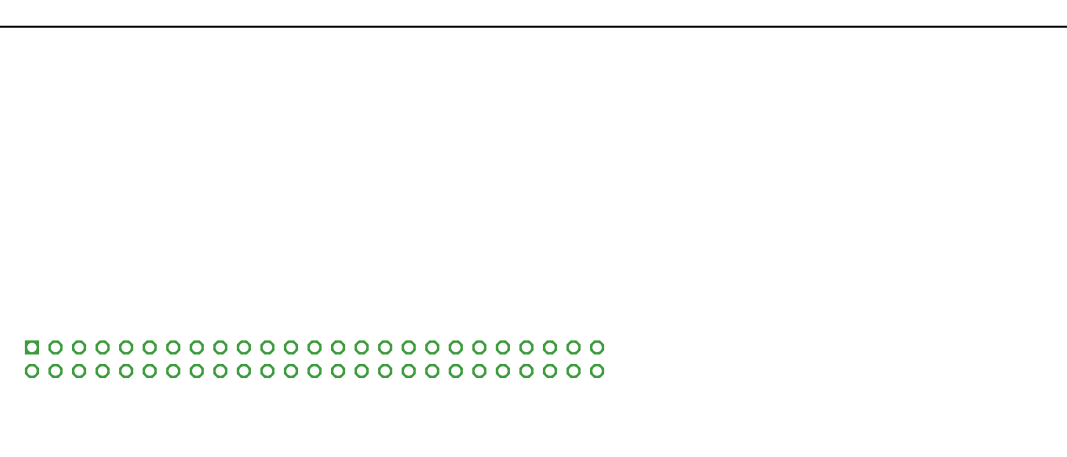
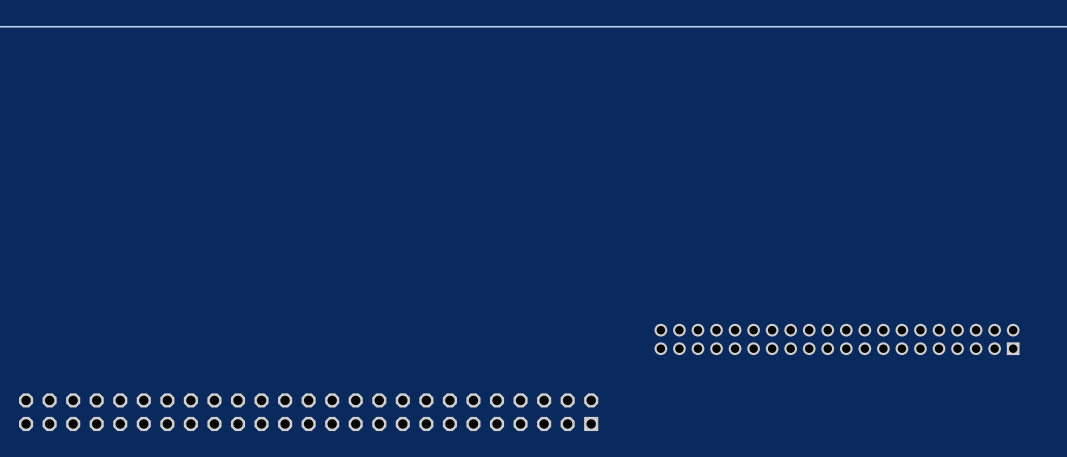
part: none -> (837, 339)
part rotation: 0° (314, 359) -> 180° (308, 412)

